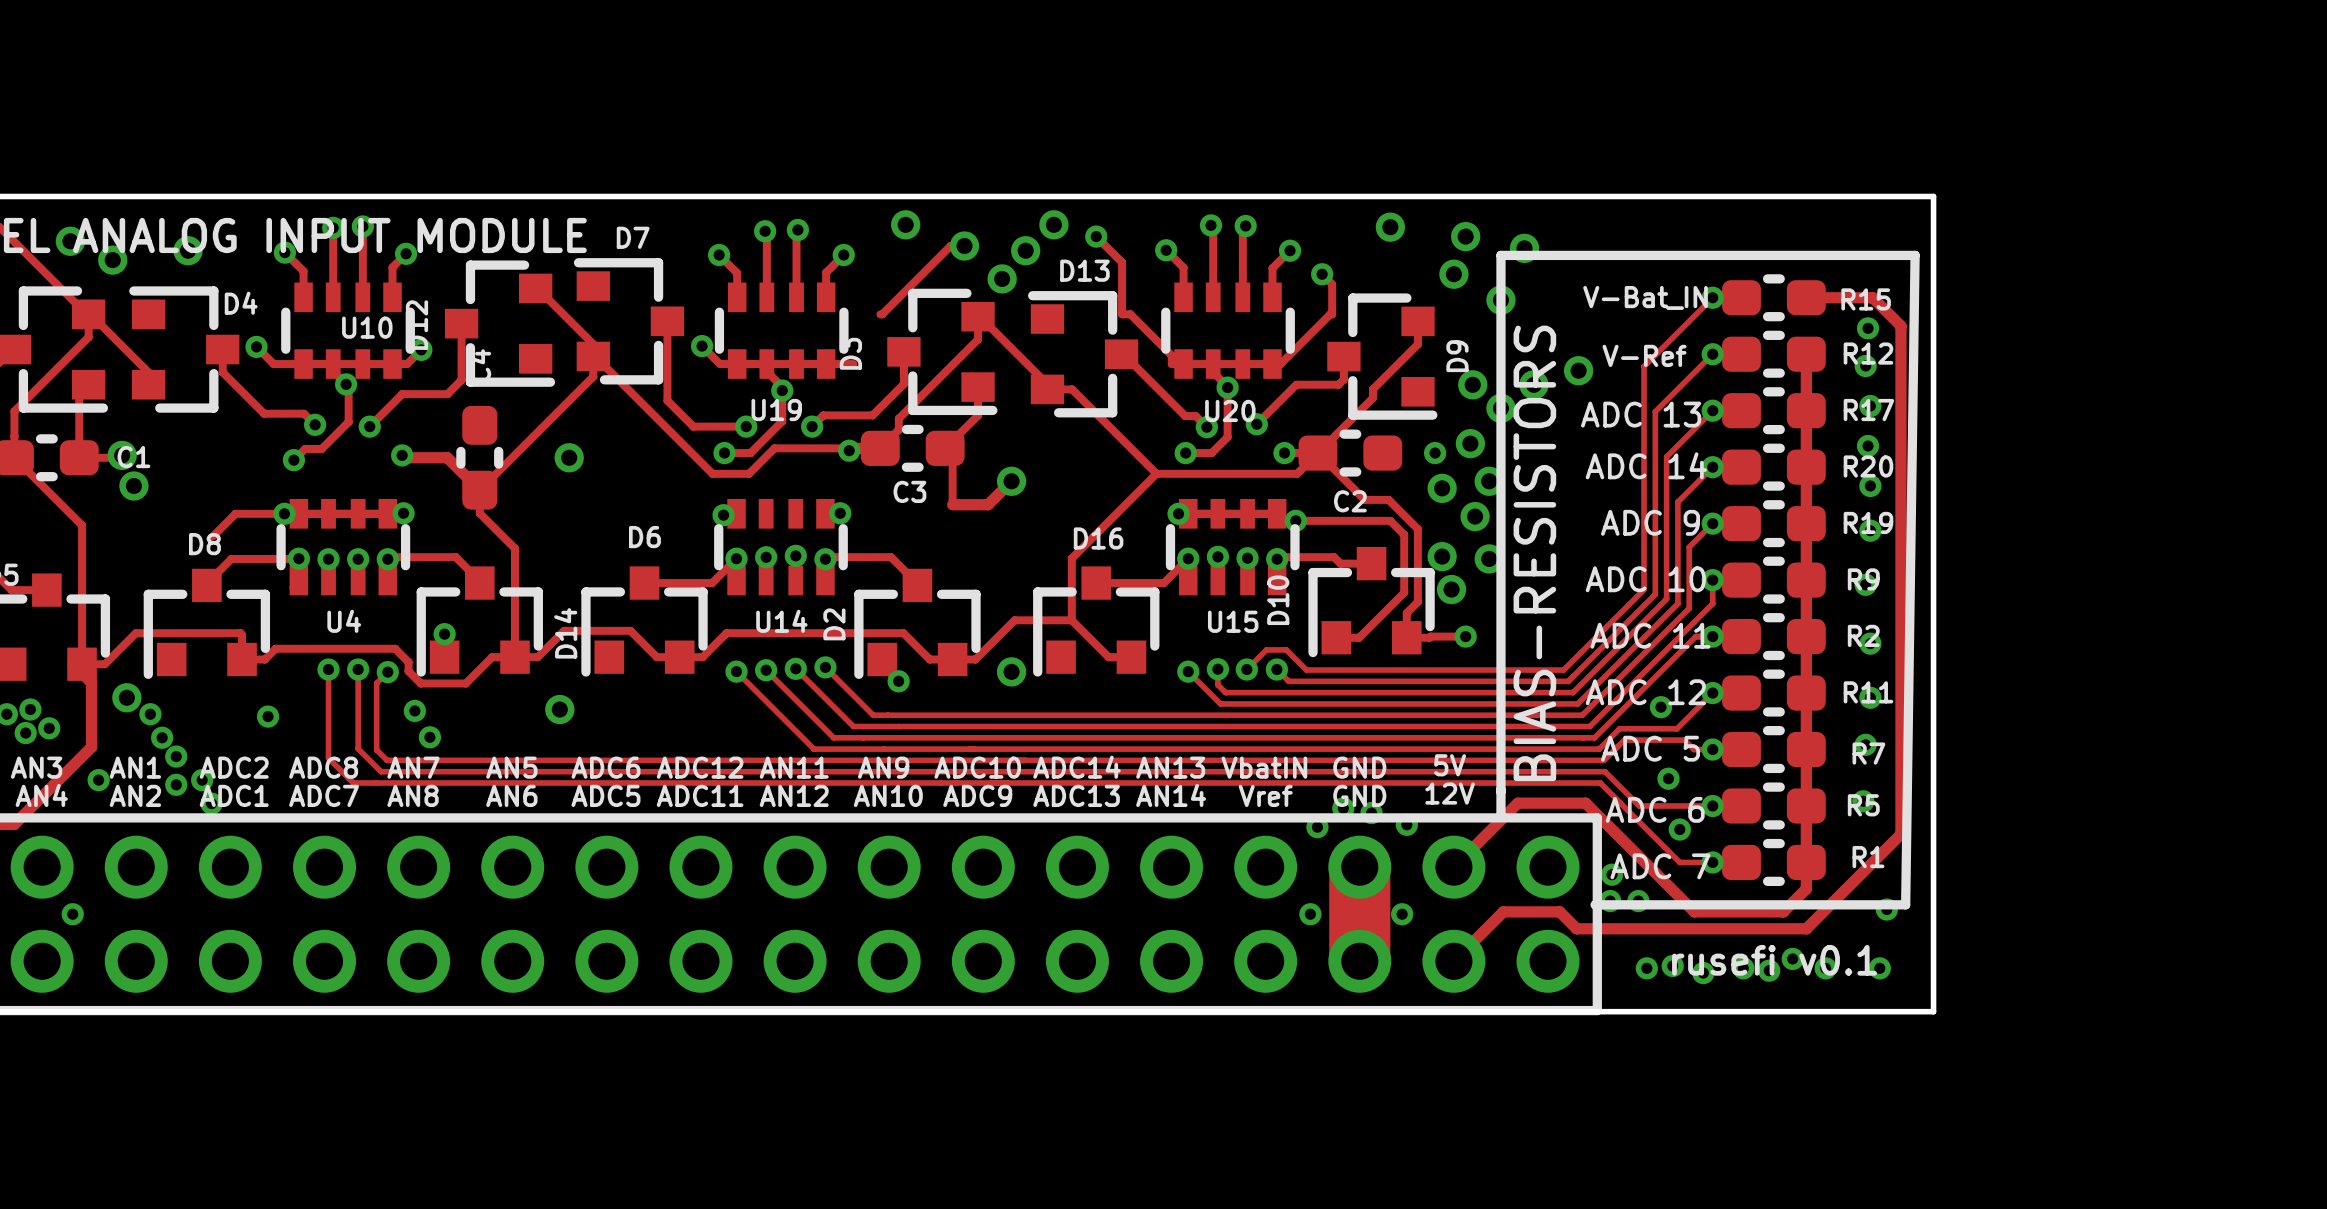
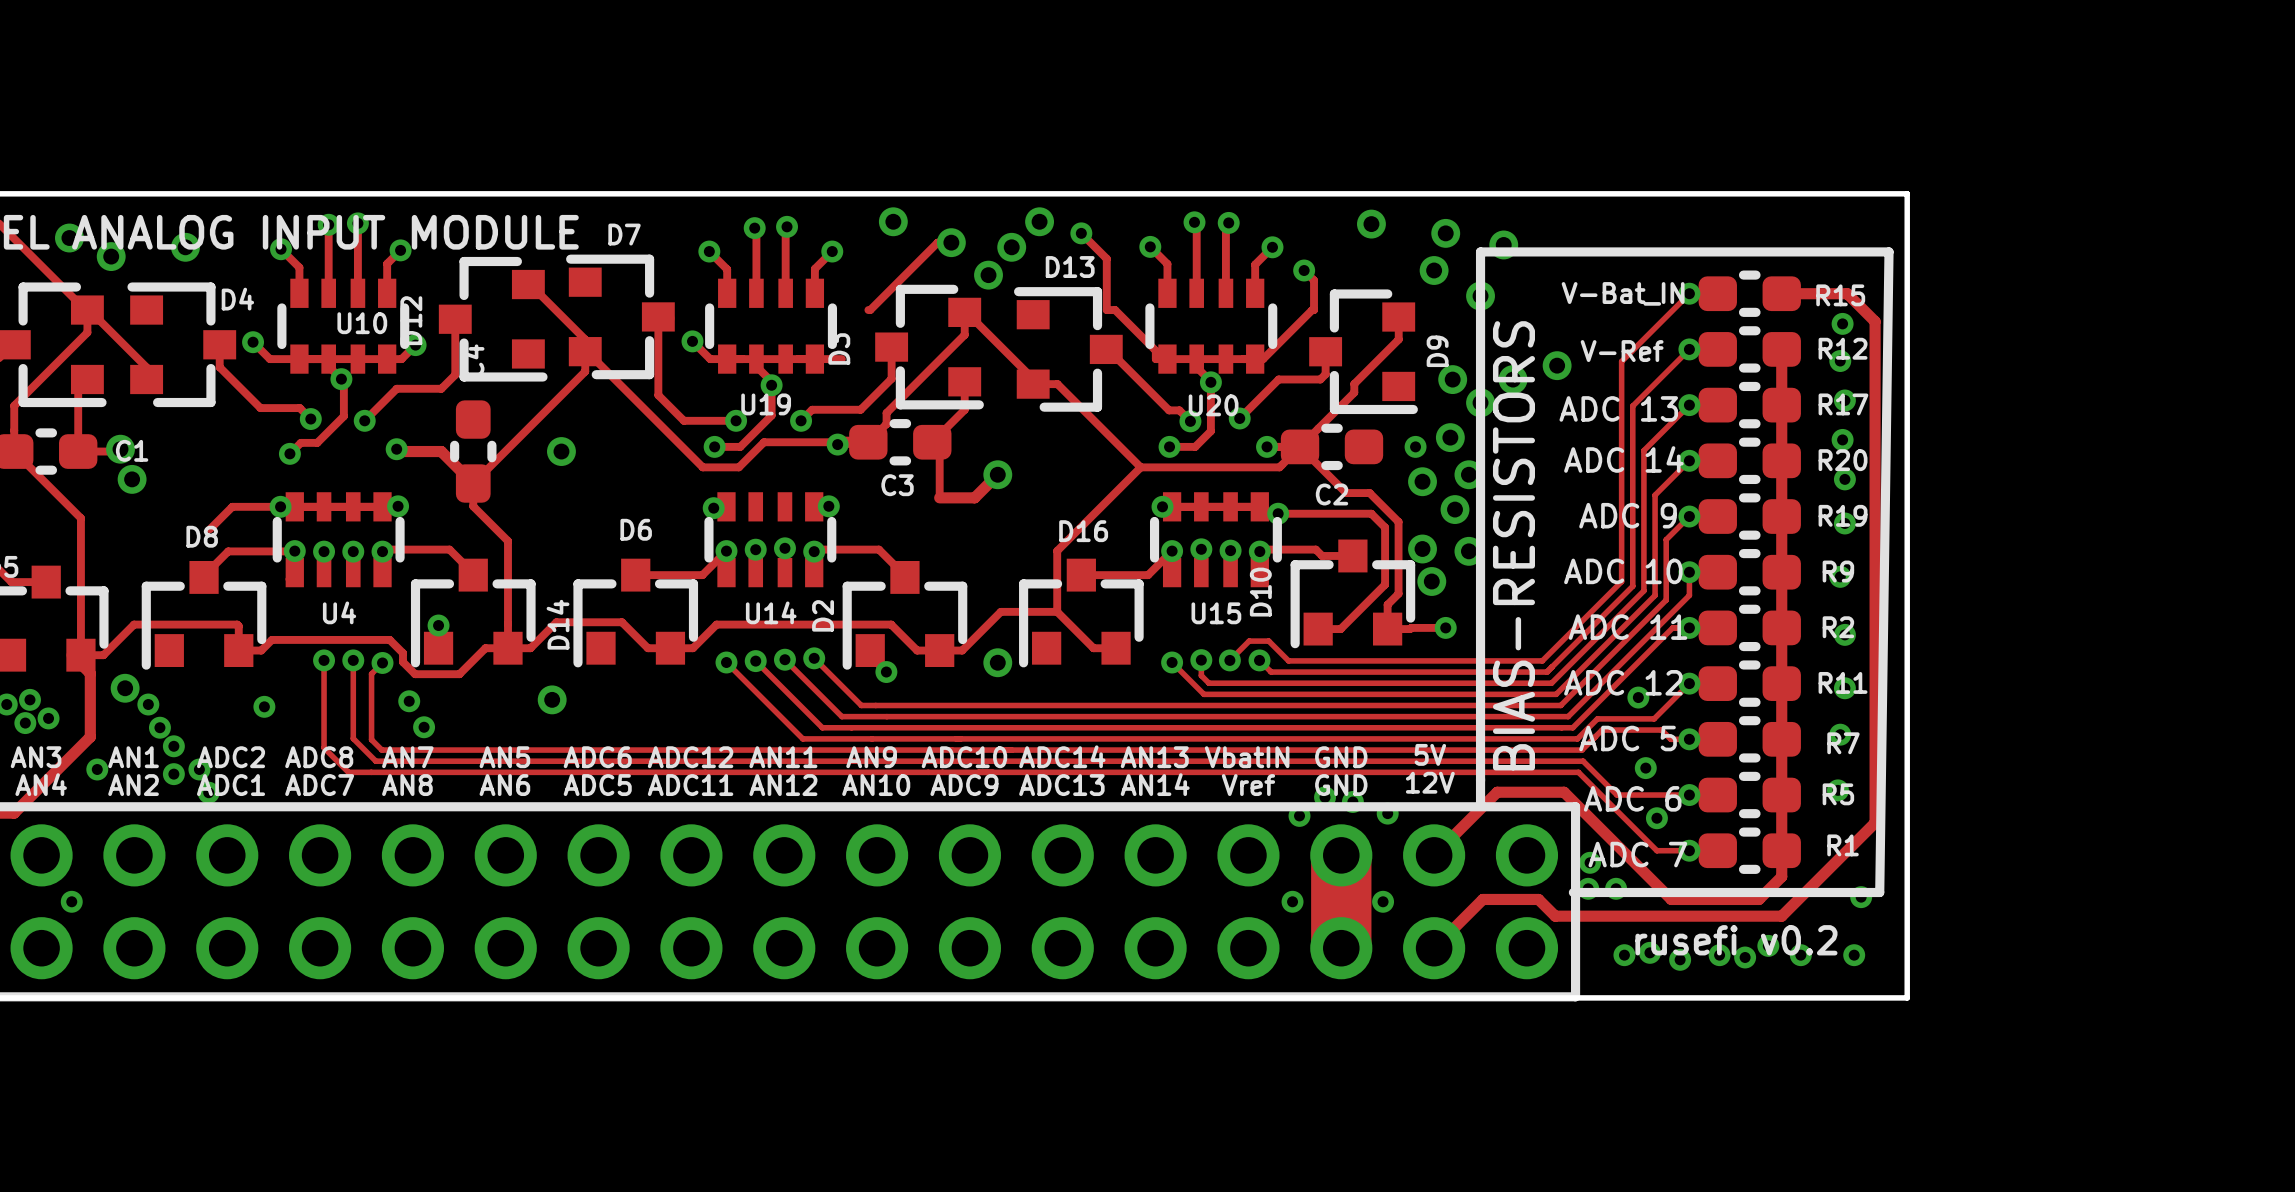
text: rusefi v0.1 (1774, 960) -> rusefi v0.2 (1736, 940)

